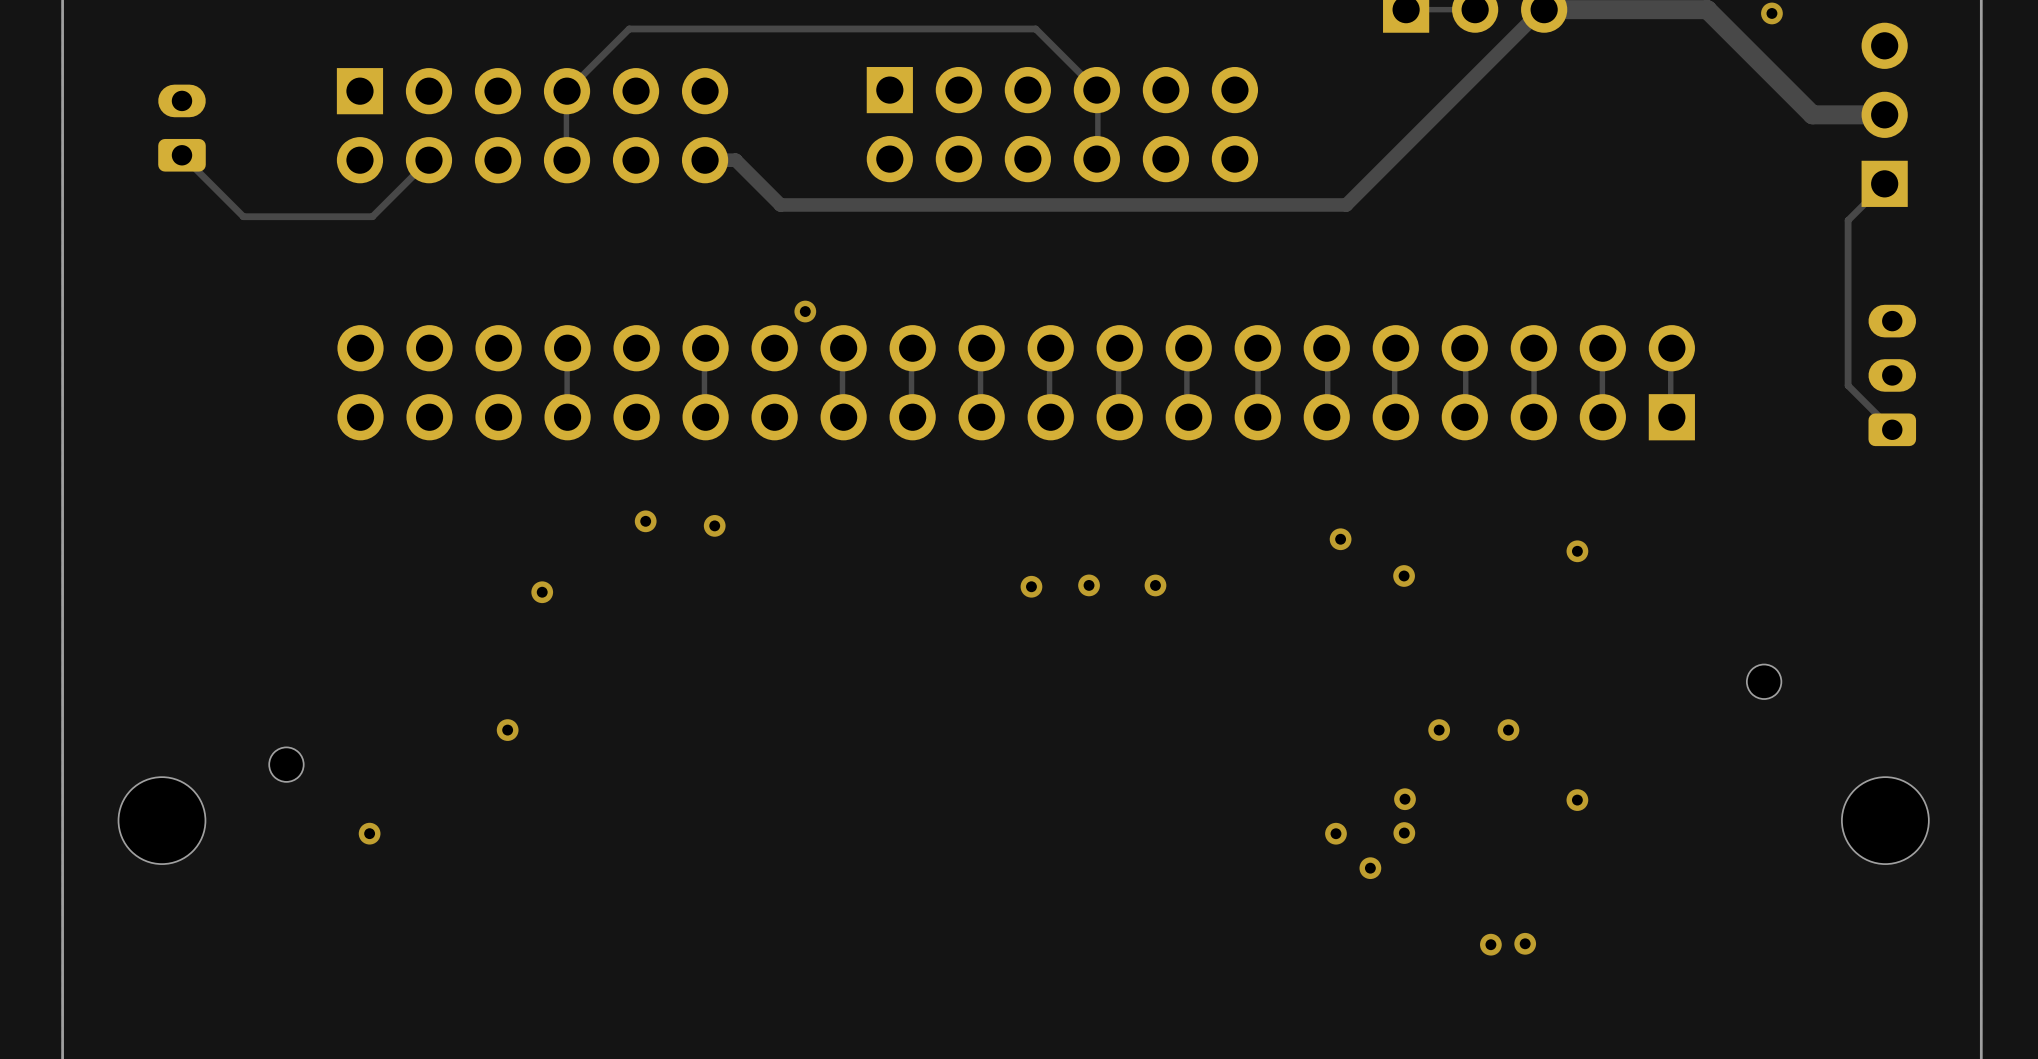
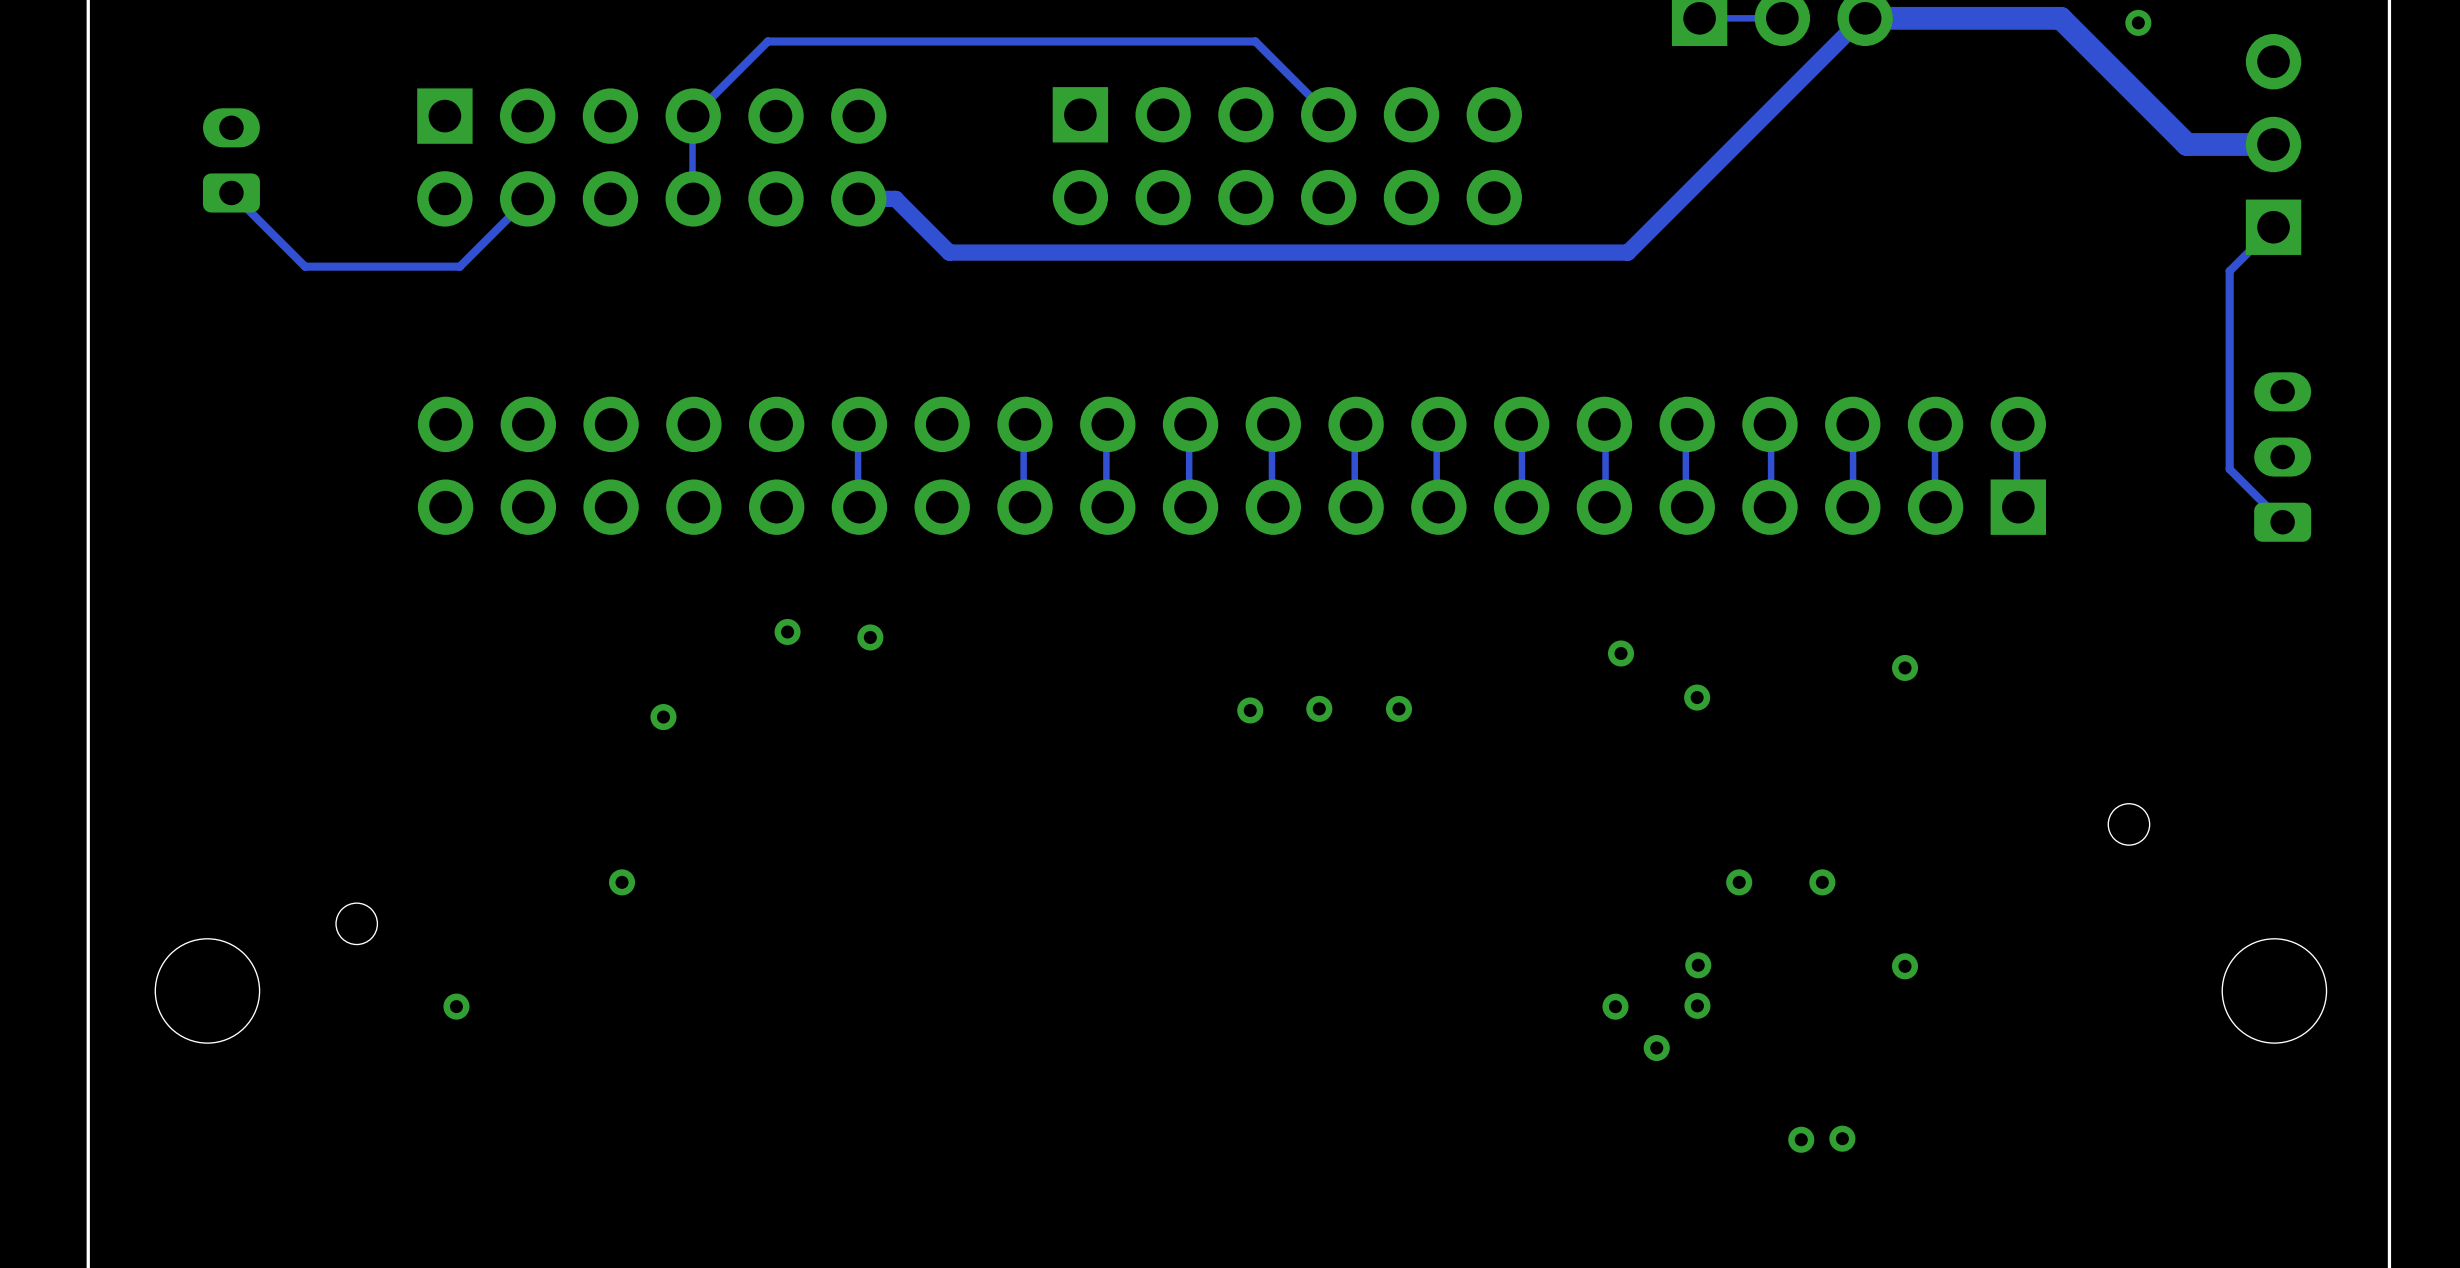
track: (1097, 106) (1097, 140) -> none
via: (805, 311) -> none
track: (567, 365) (567, 399) -> none

